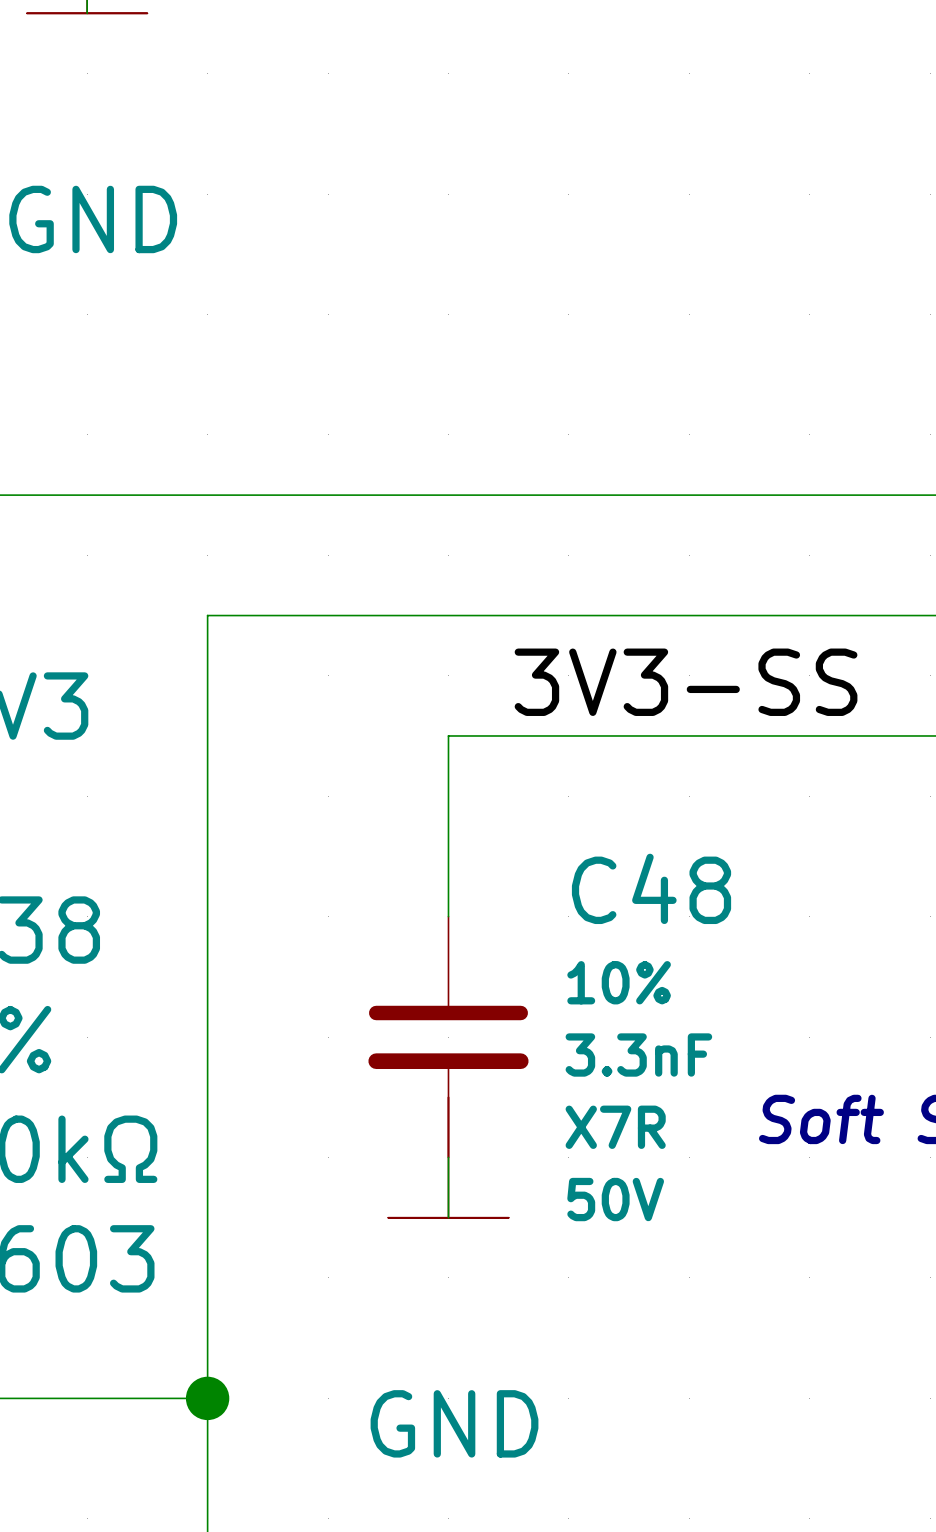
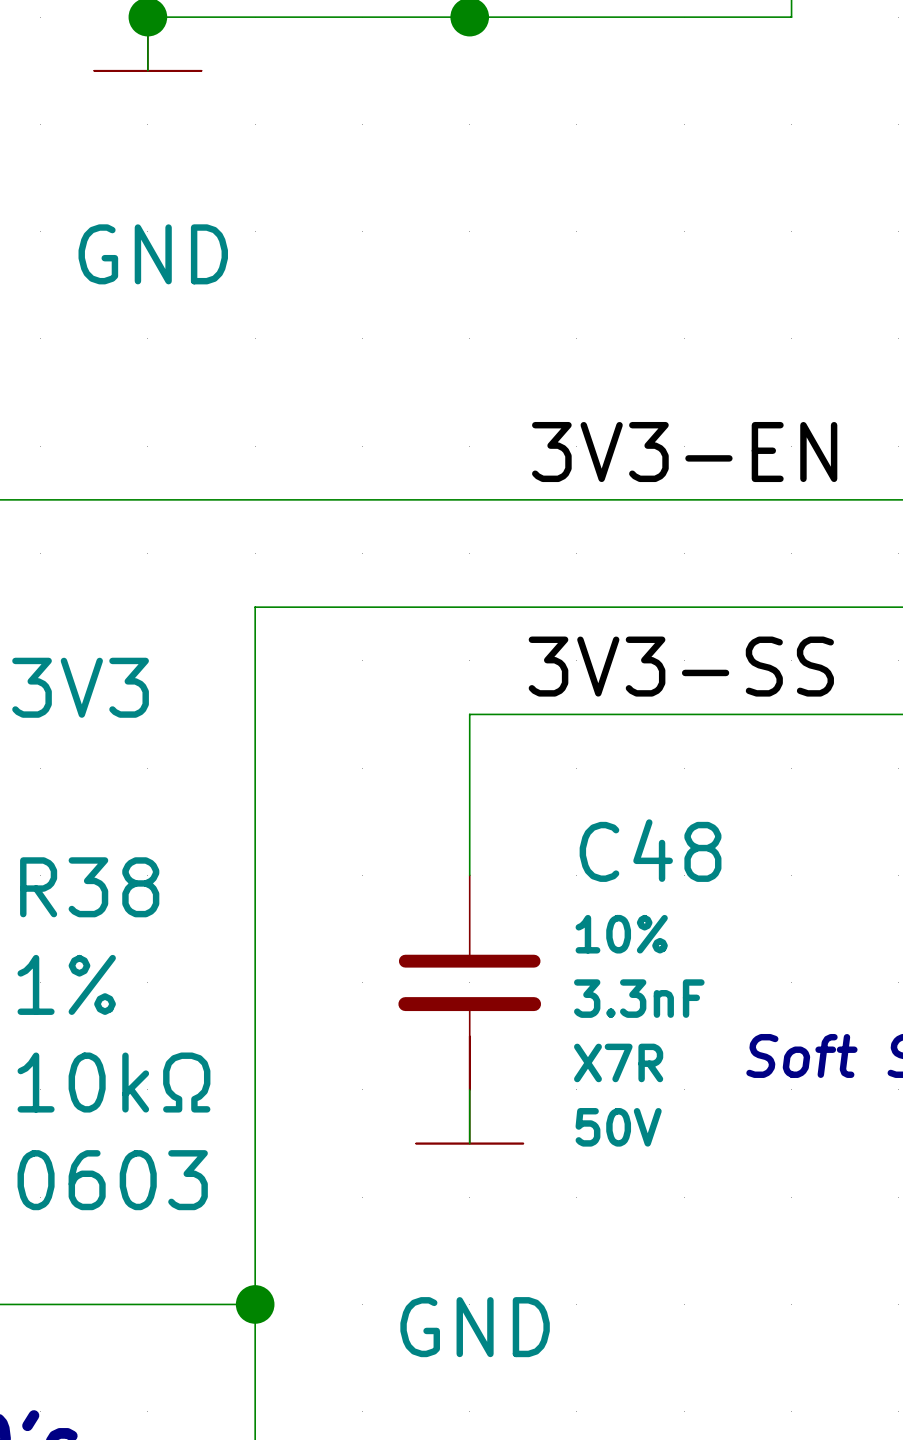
label: none -> 3V3-EN (684, 452)

